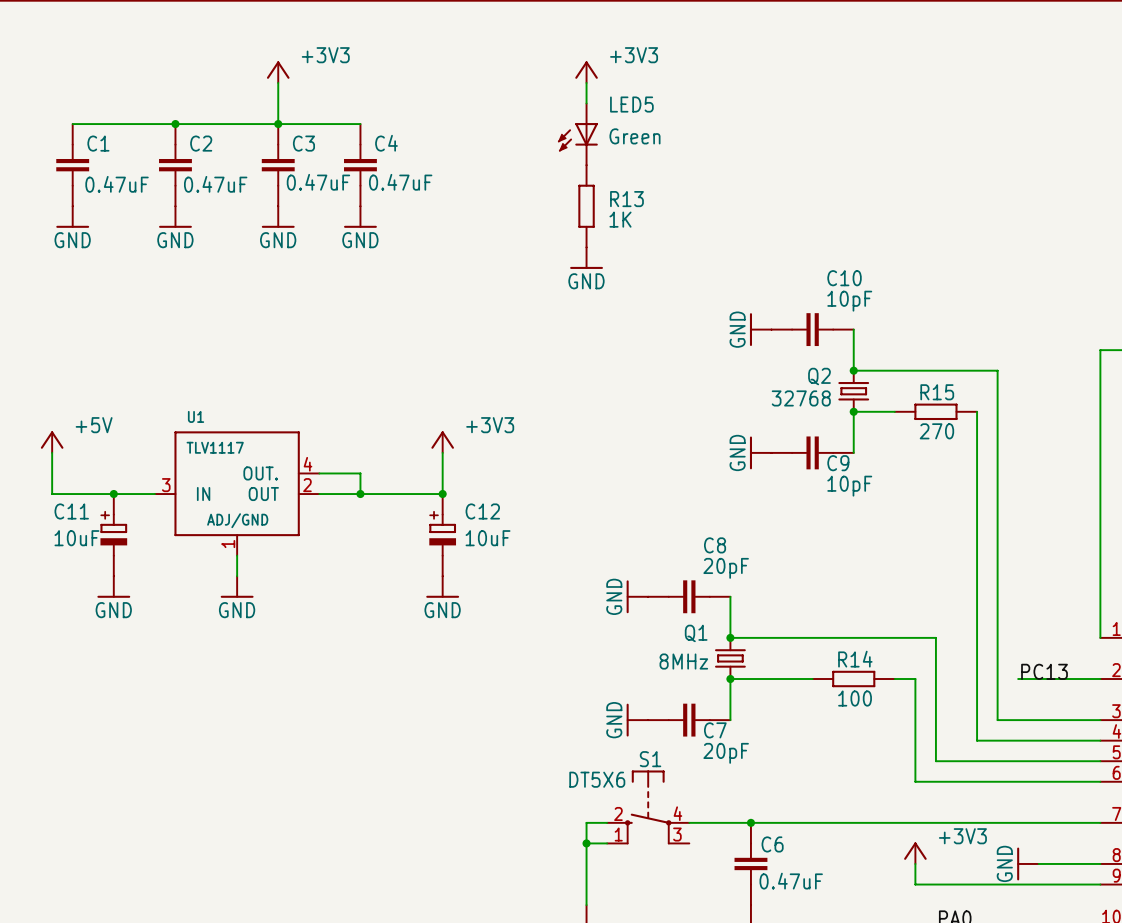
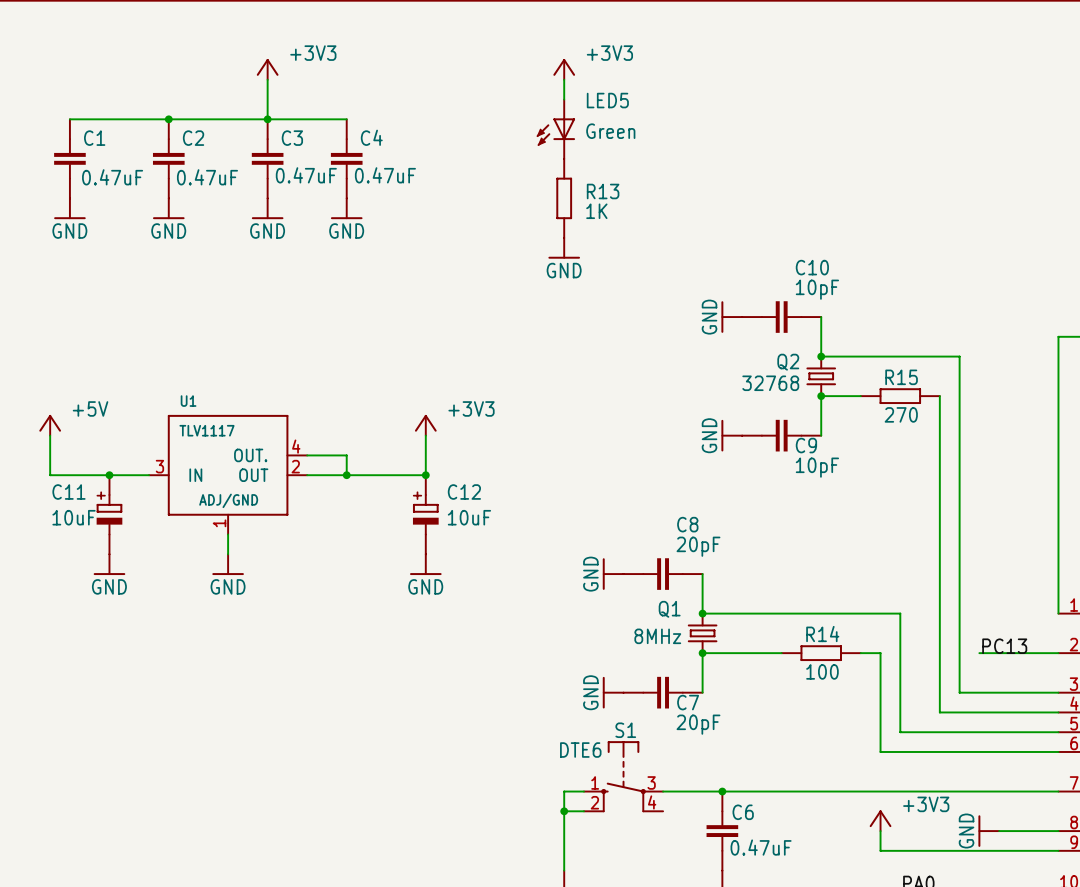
S1 value: DT5X6 (597, 779) -> DTE6 (580, 750)
S1 pin number: 2 (618, 813) -> 1 (595, 782)
S1 pin number: 4 (677, 813) -> 3 (651, 782)
S1 pin number: 1 (618, 834) -> 2 (594, 802)
S1 pin number: 3 (677, 834) -> 4 (652, 802)

